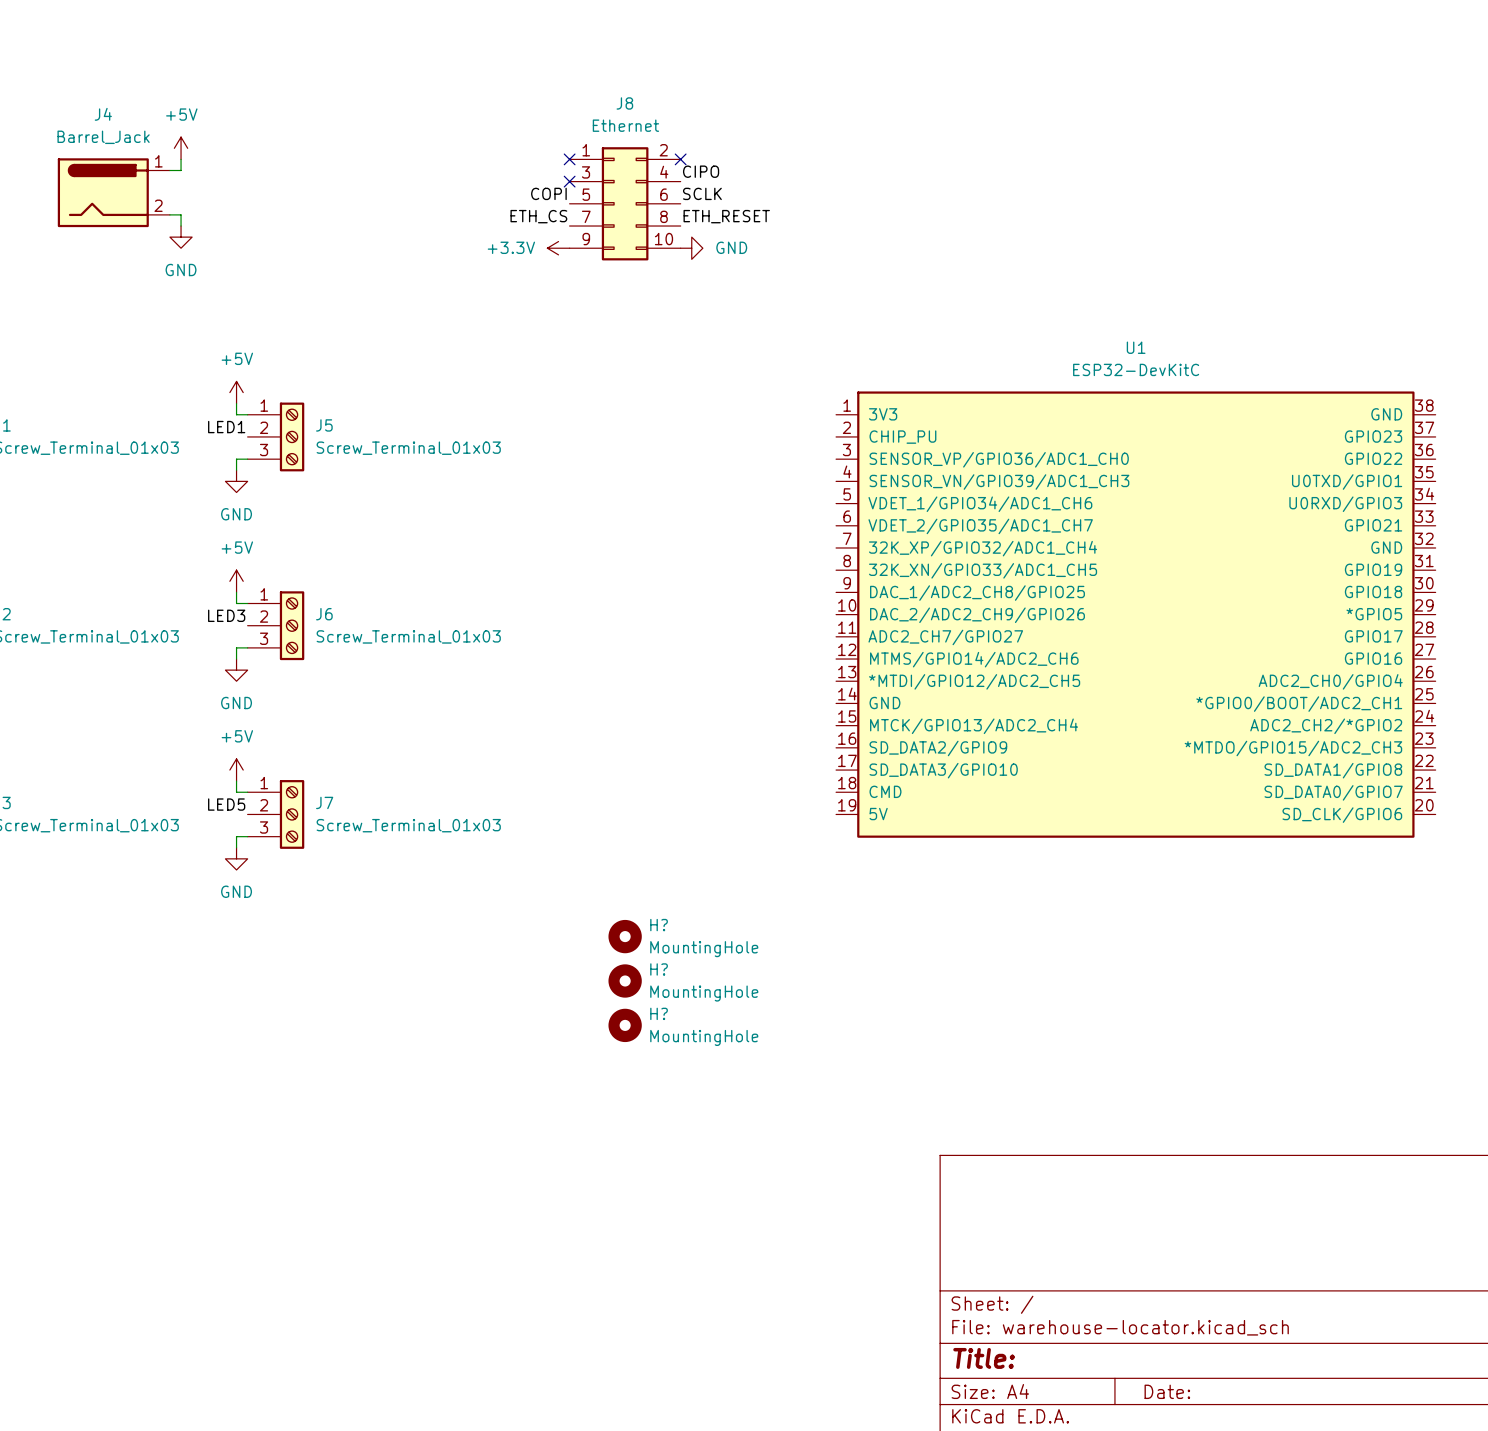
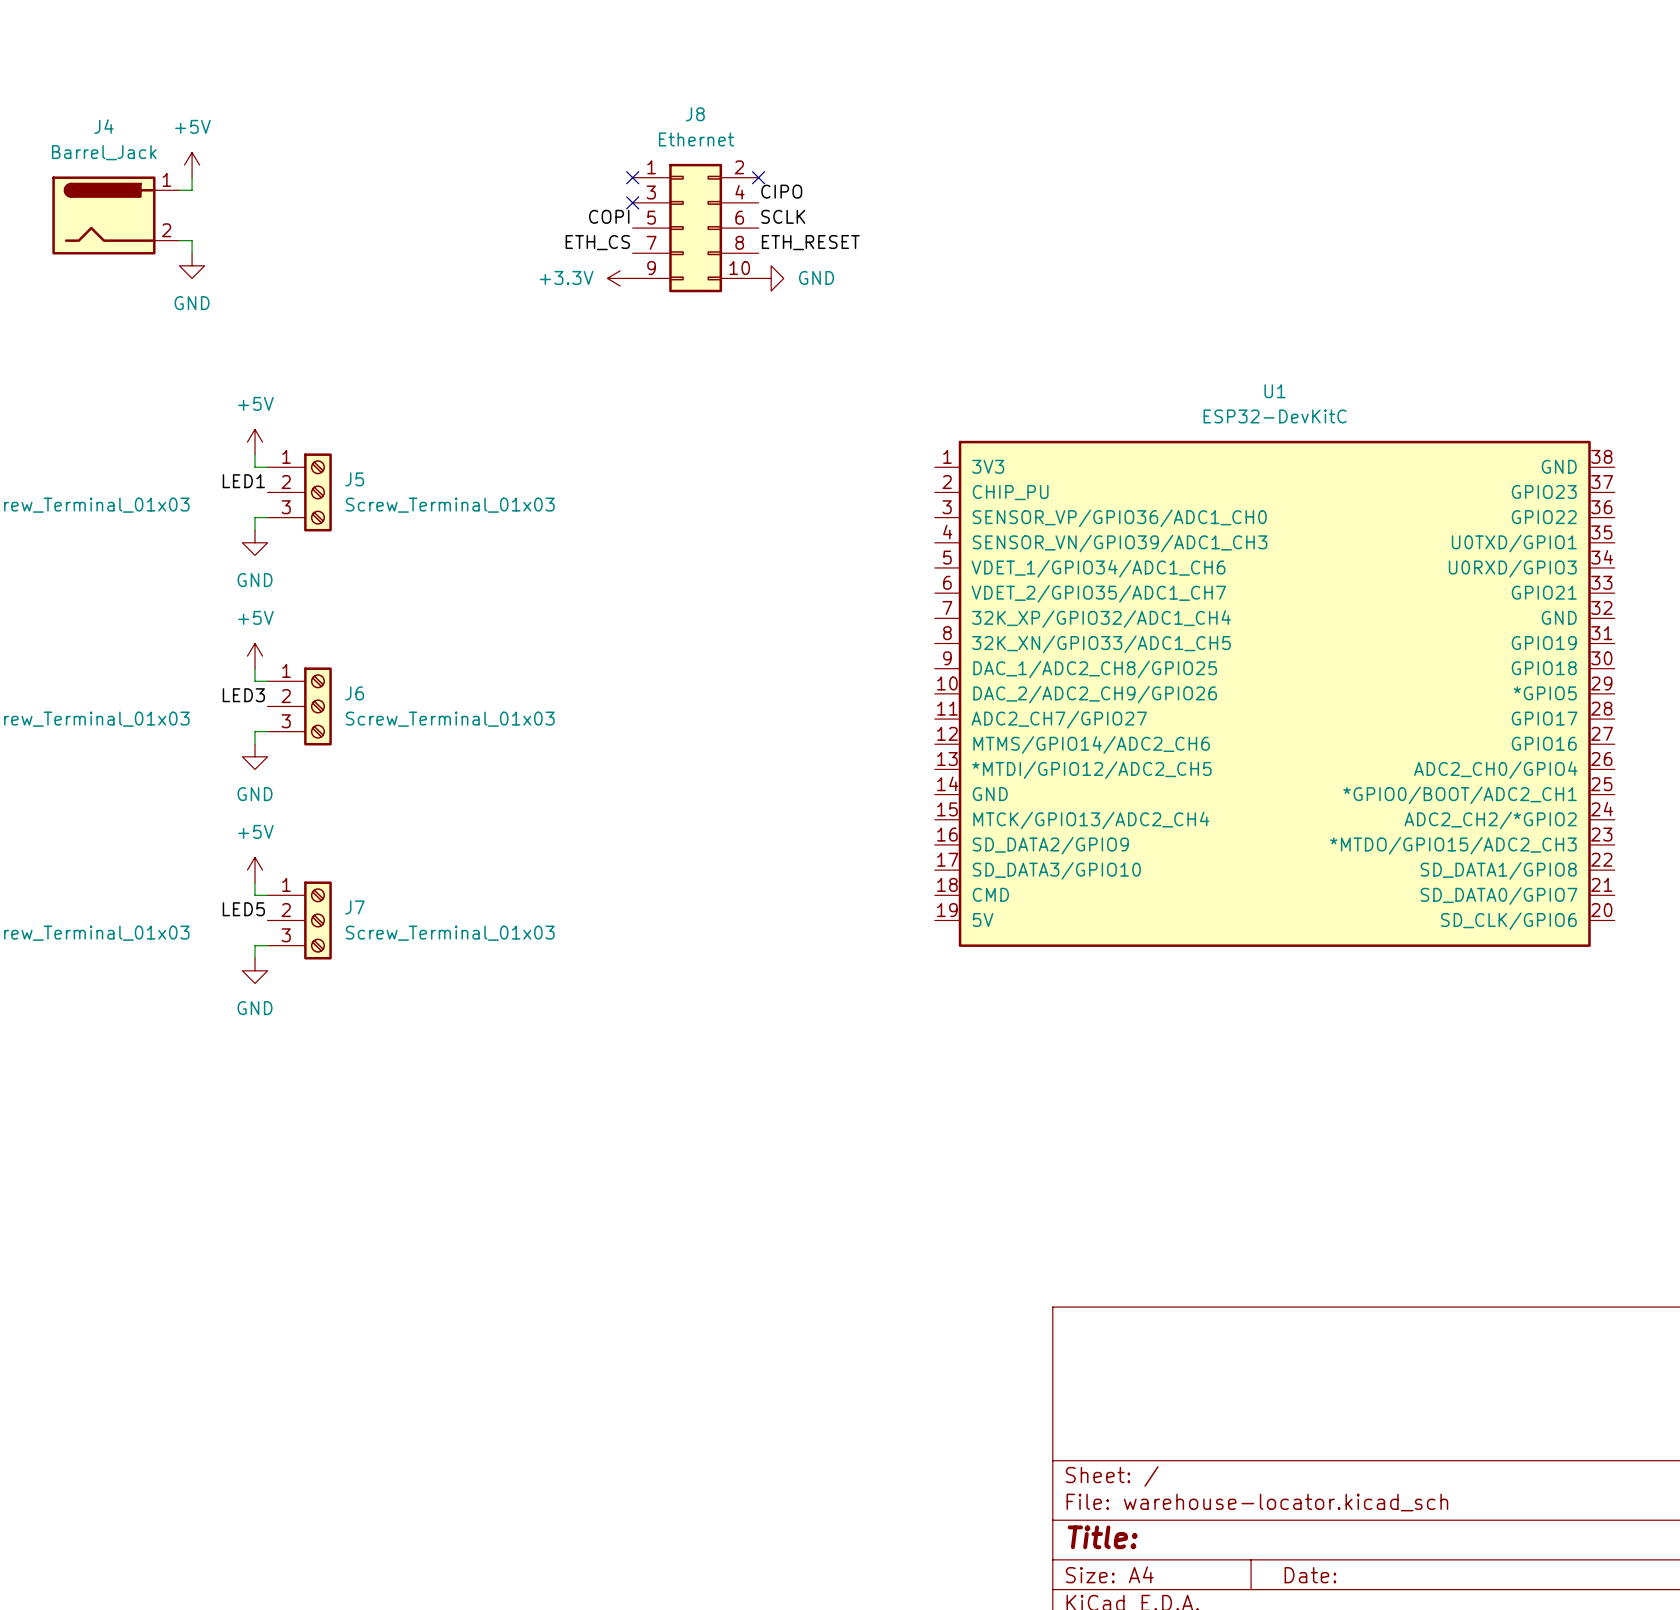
H?: MountingHole (625, 936) -> none
H?: MountingHole (625, 980) -> none
H?: MountingHole (625, 1025) -> none

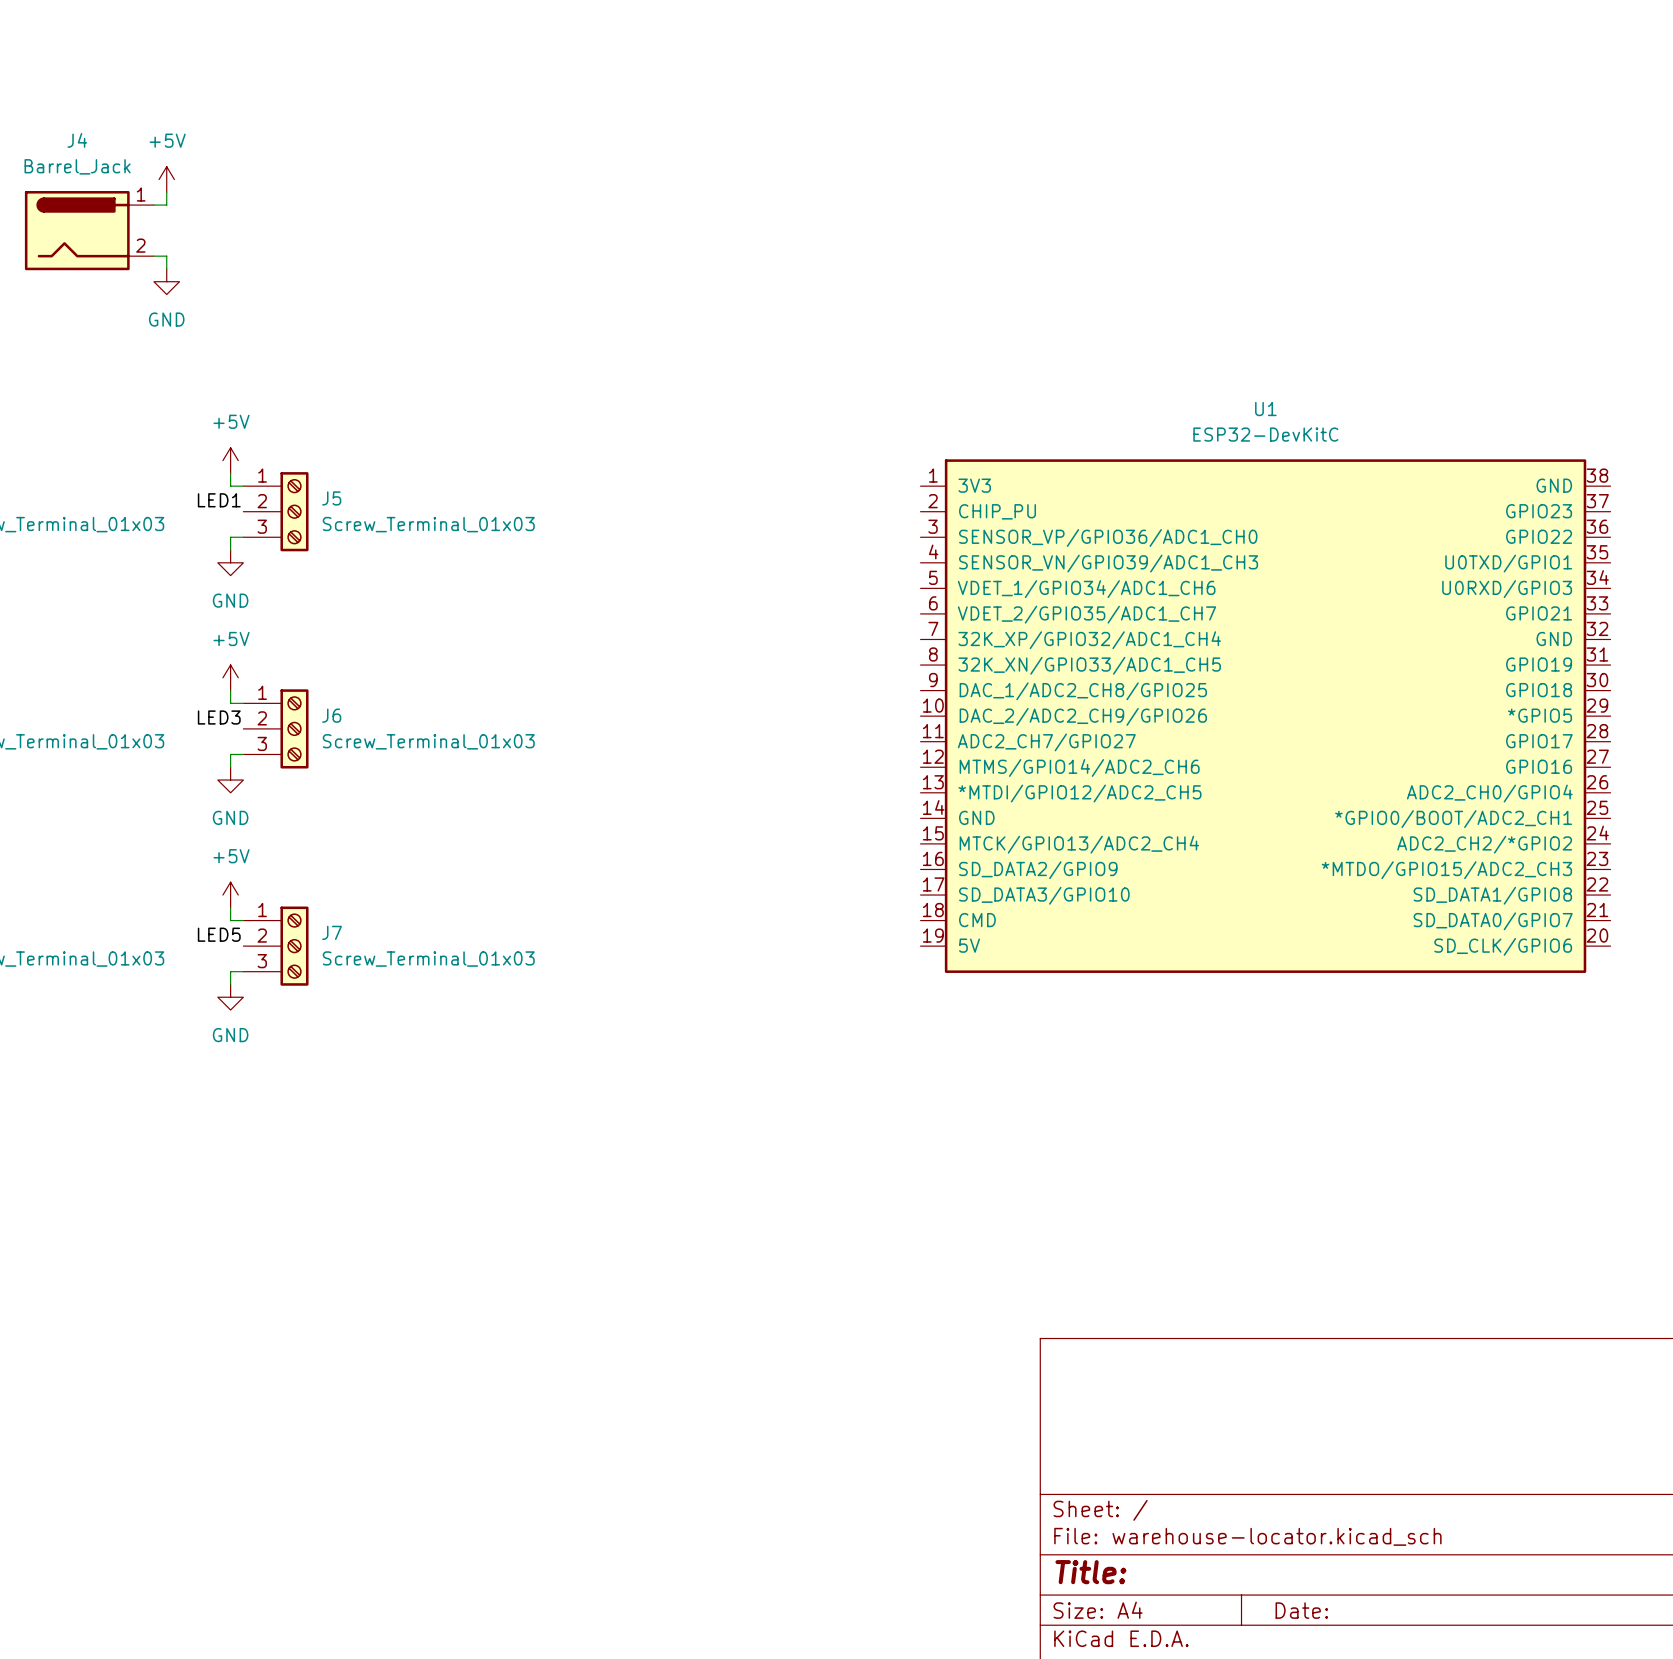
no-connect mark: (632, 177) -> none
no-connect mark: (758, 177) -> none
label: CIPO (781, 191) -> none
no-connect mark: (632, 202) -> none
label: COPI (609, 216) -> none
label: SCLK (783, 216) -> none
J8: Ethernet (695, 228) -> none
label: ETH_CS (597, 242) -> none
label: ETH_RESET (810, 242) -> none
power symbol: +3.3V (620, 278) -> none
power symbol: GND (771, 278) -> none

